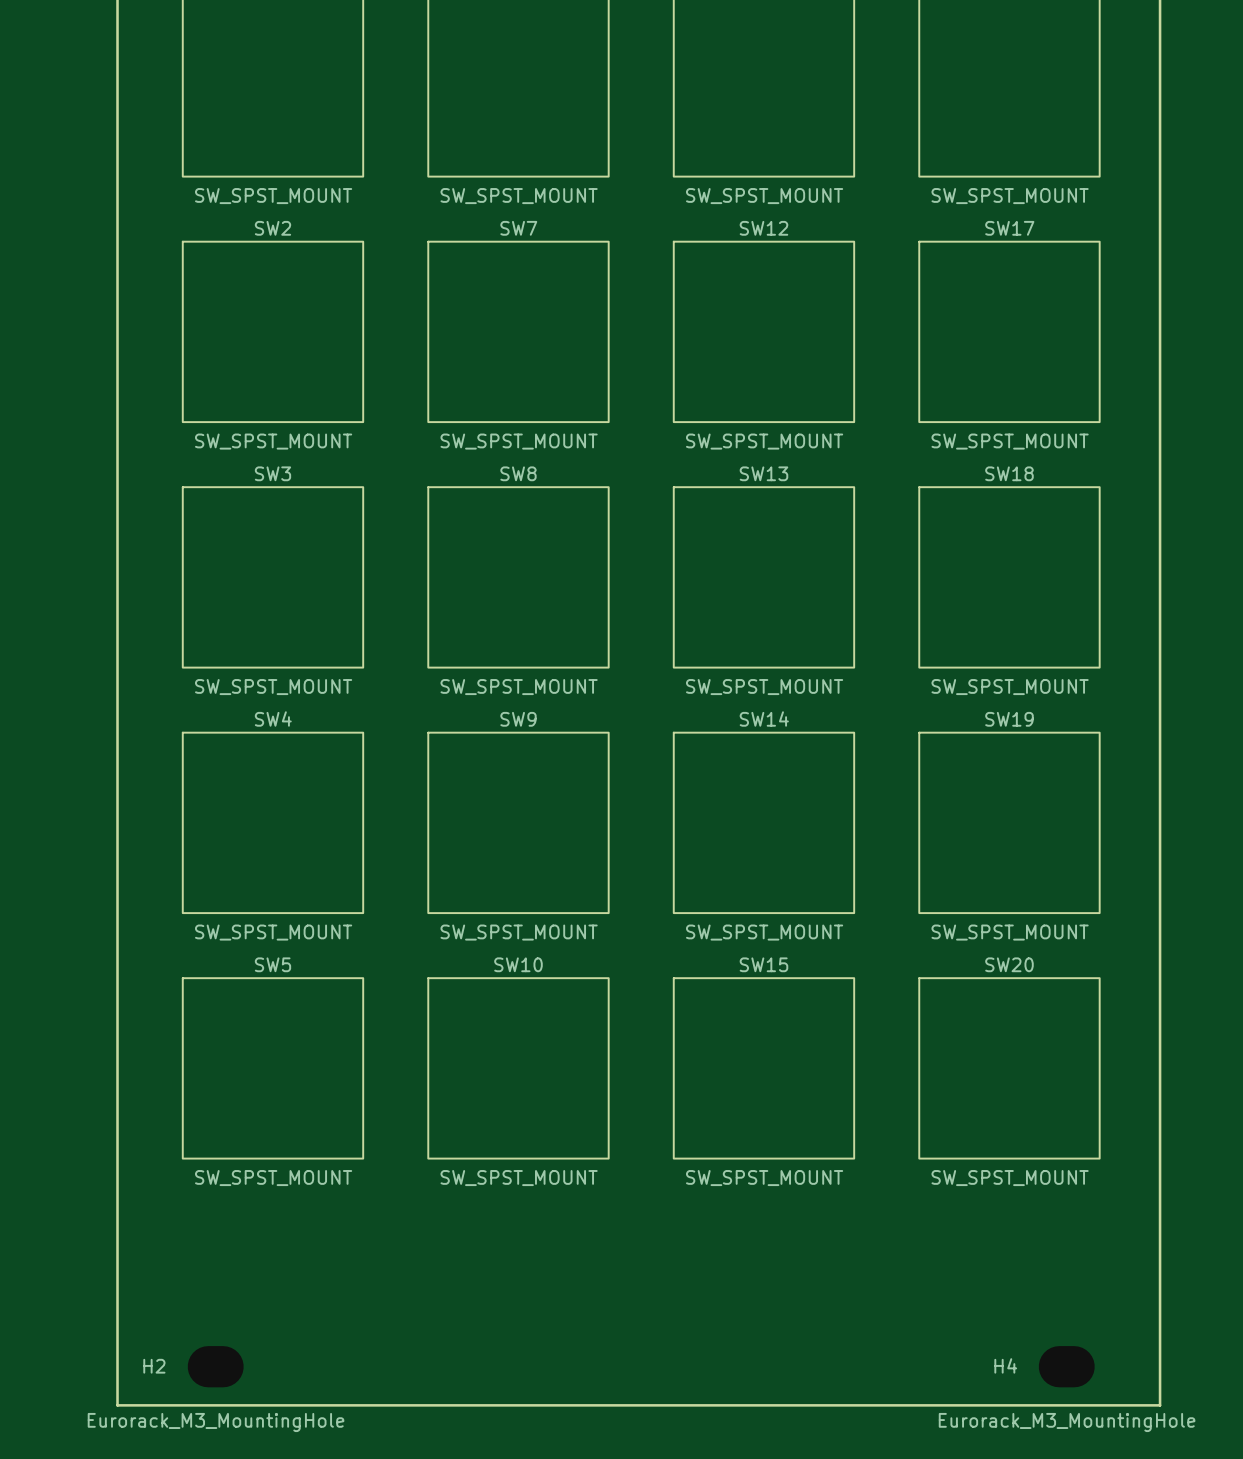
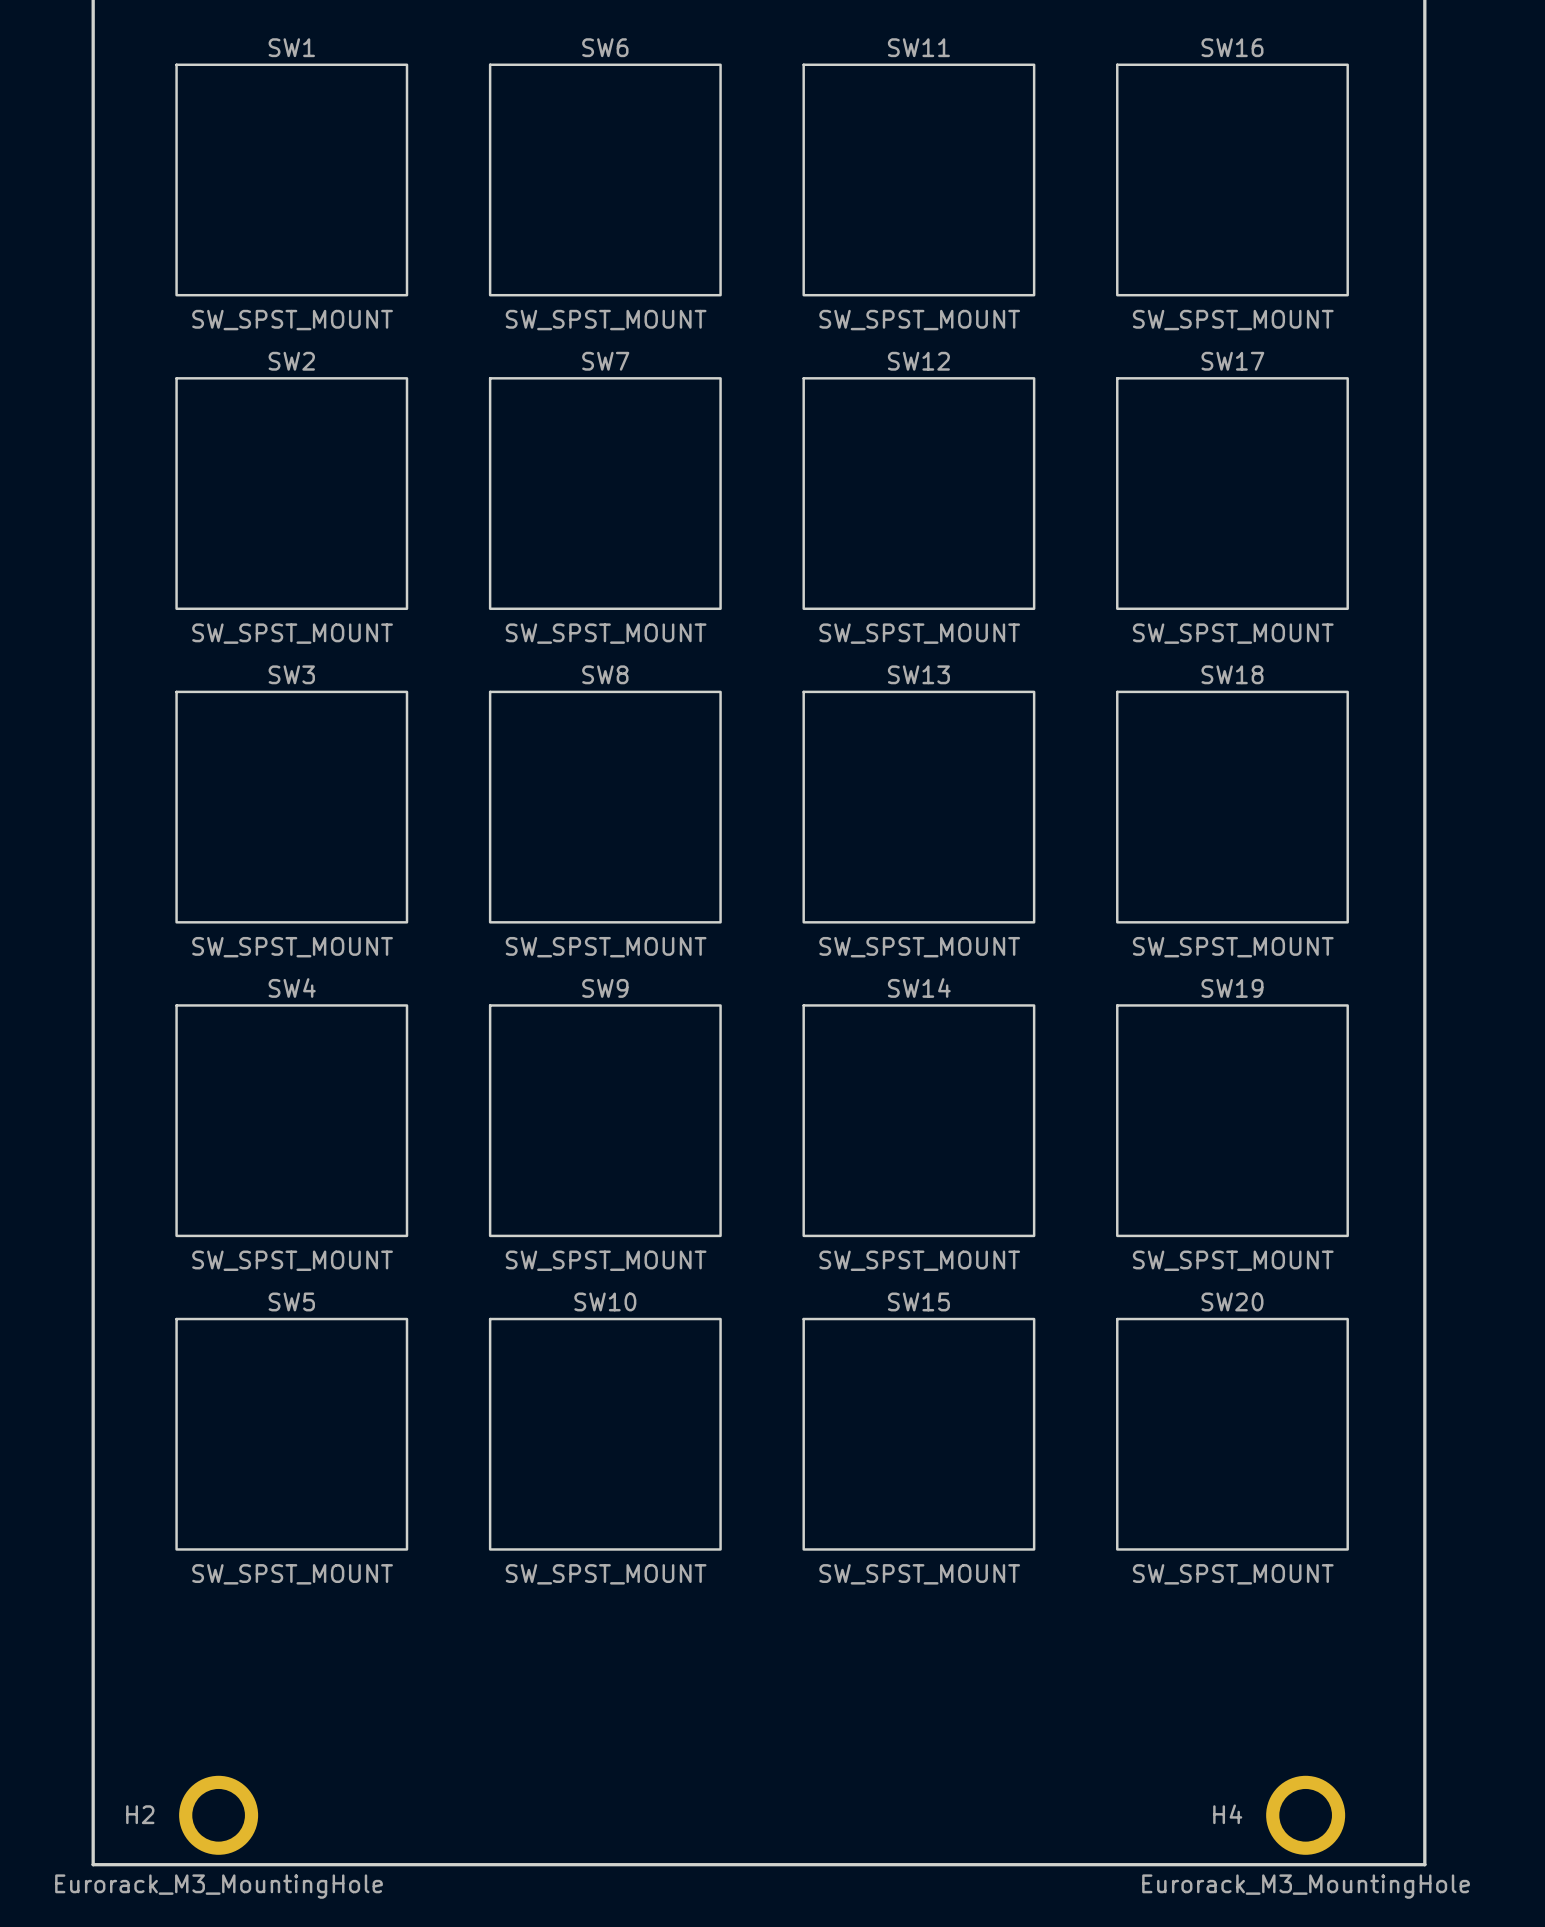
H2 footprint: [187, 1346, 244, 1388] -> [179, 1775, 259, 1855]
H4 footprint: [1038, 1346, 1095, 1388] -> [1266, 1775, 1346, 1855]

